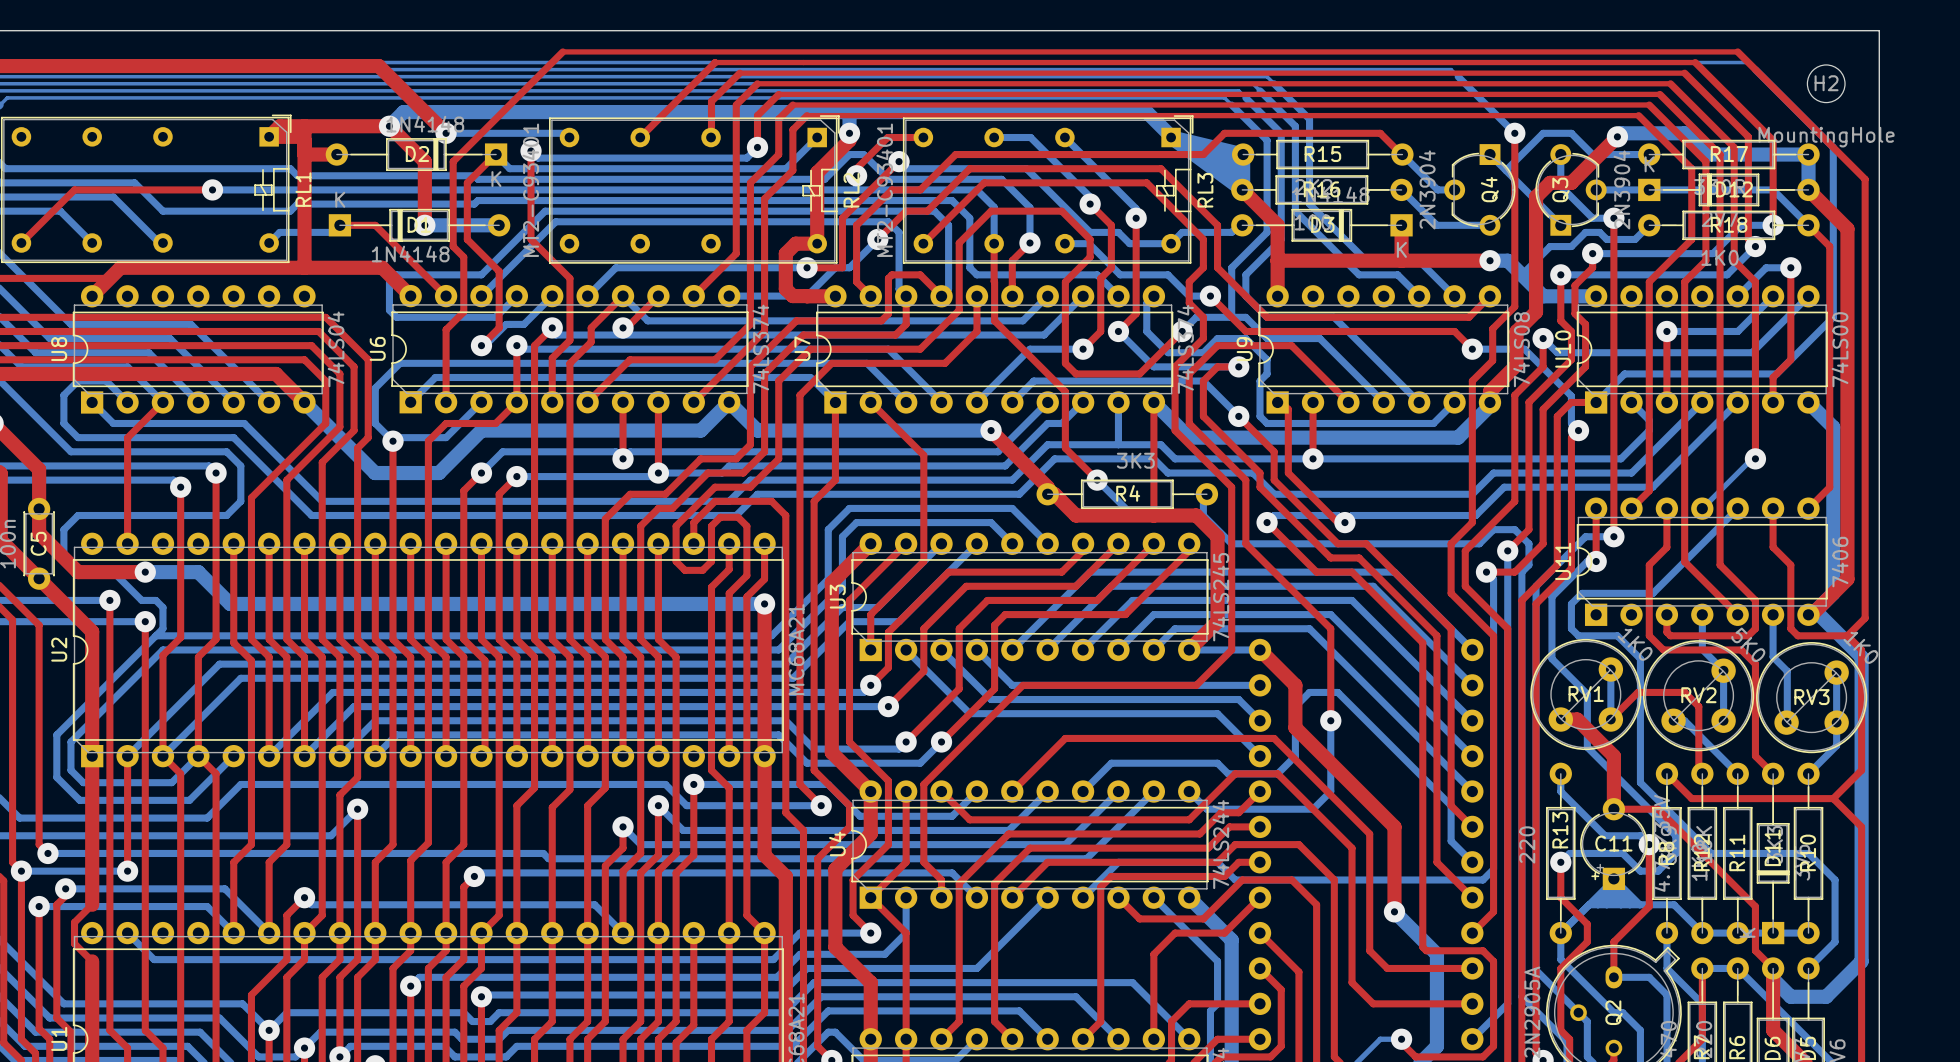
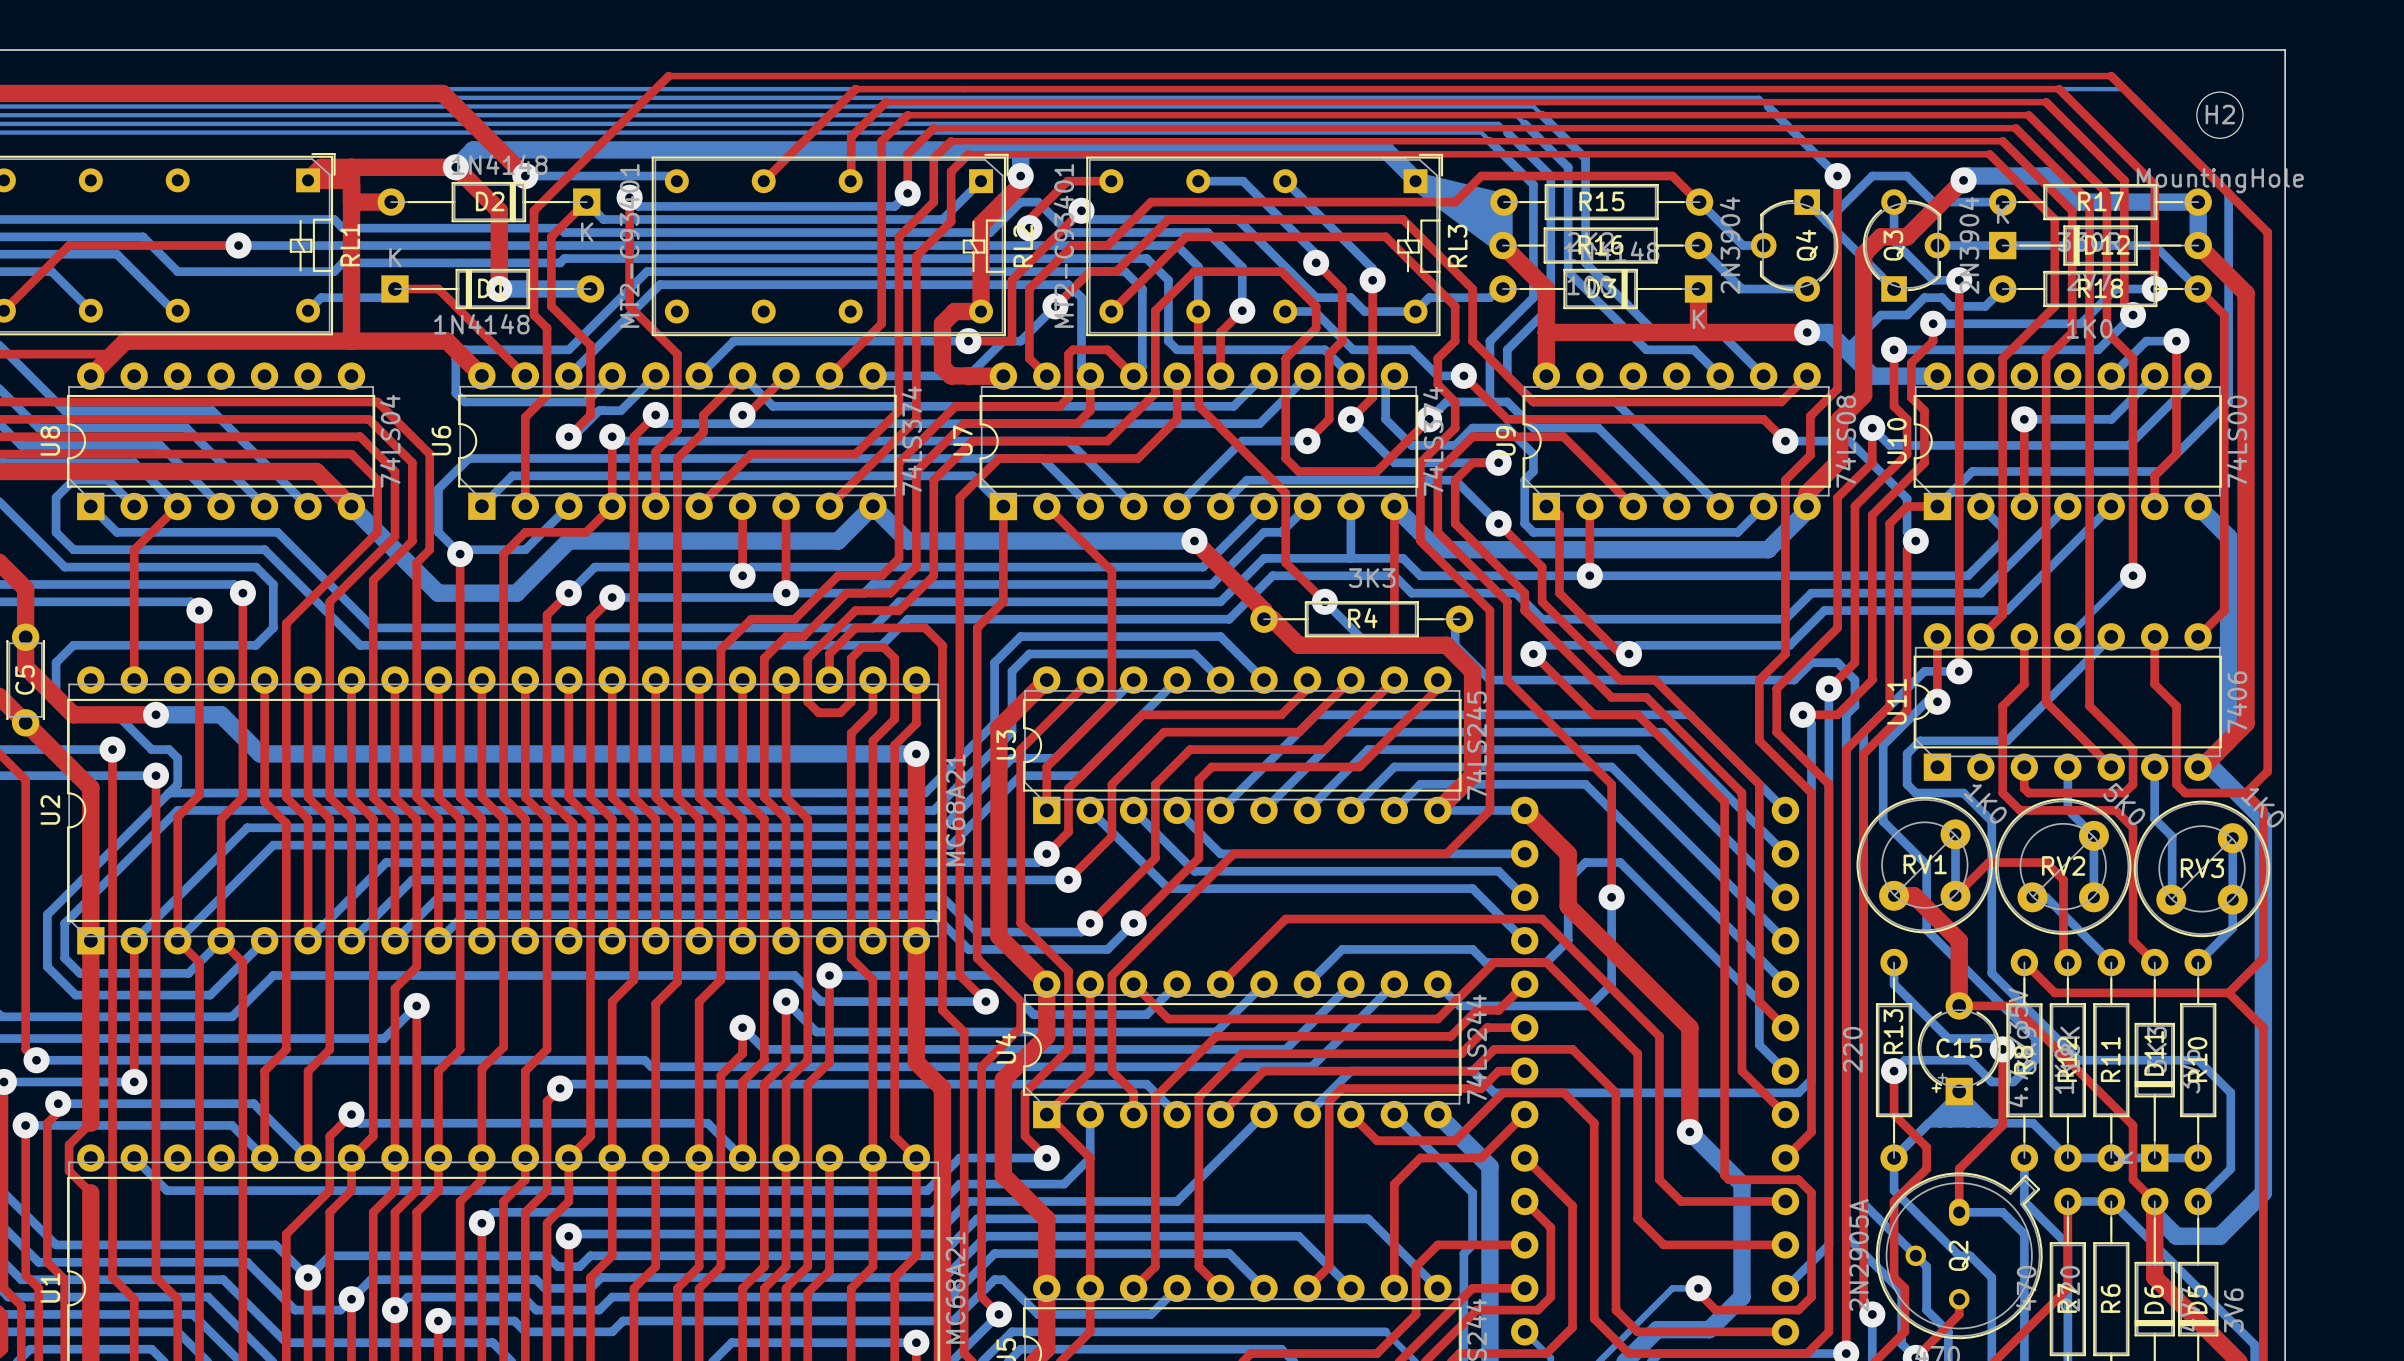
C11 name: C11 (1613, 843) -> C15 (1959, 1048)

